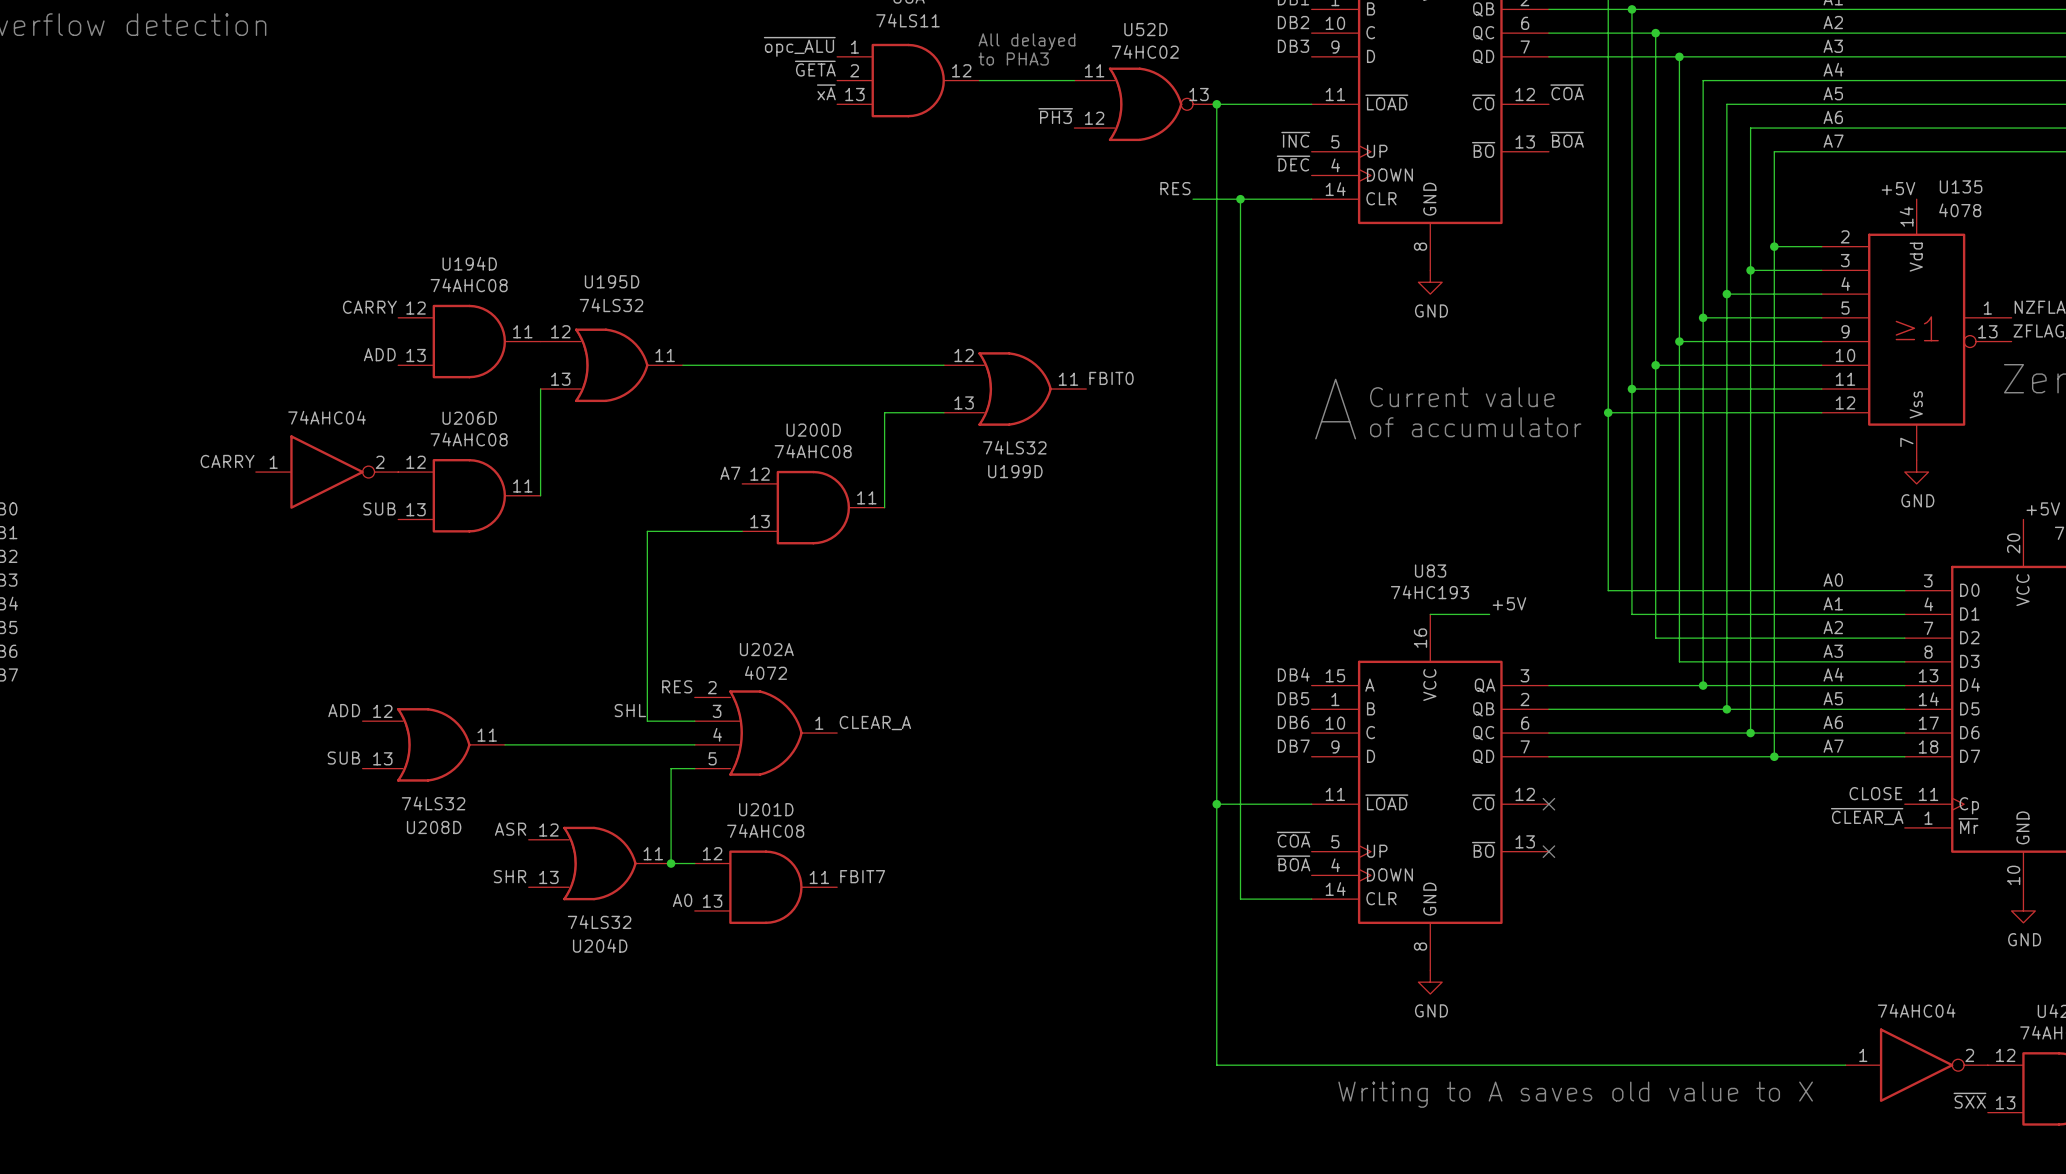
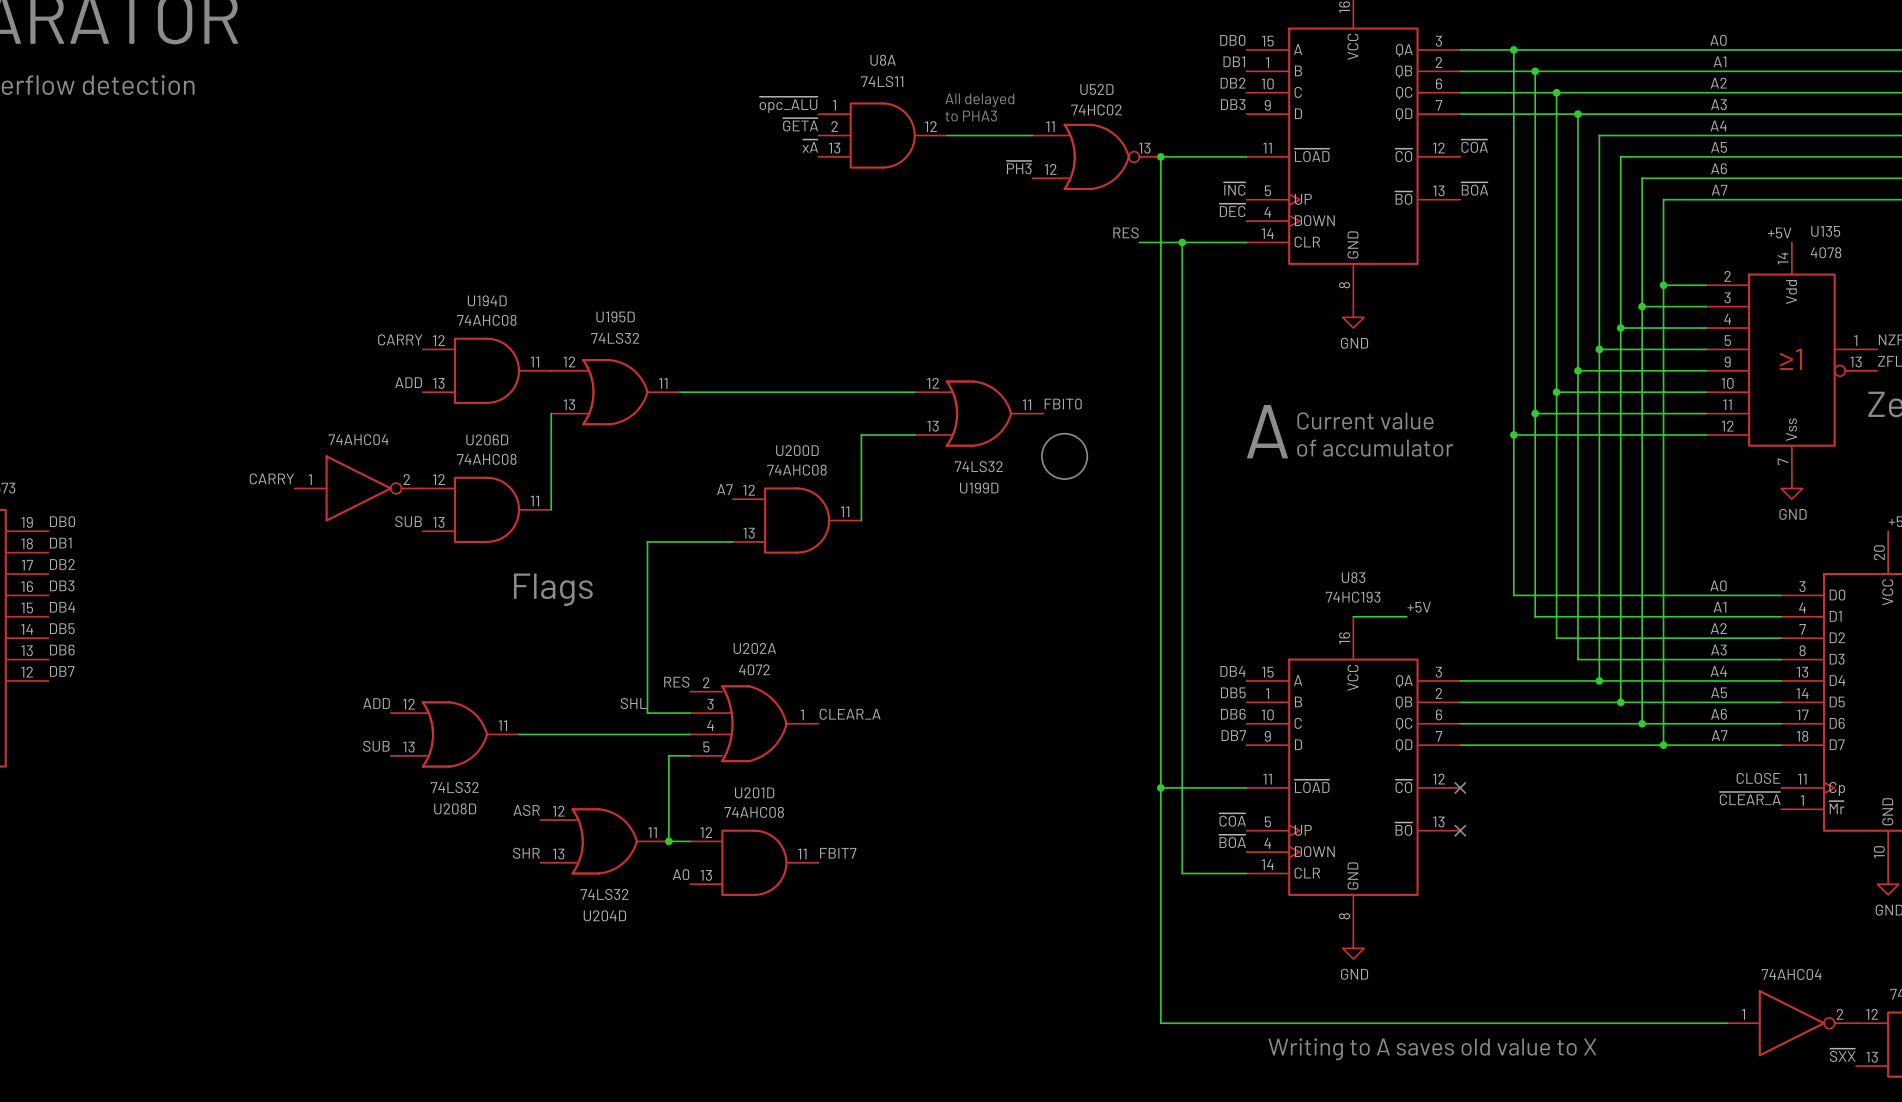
drawing: none -> [1041, 433, 1088, 480]
text: none -> Flags (553, 589)

